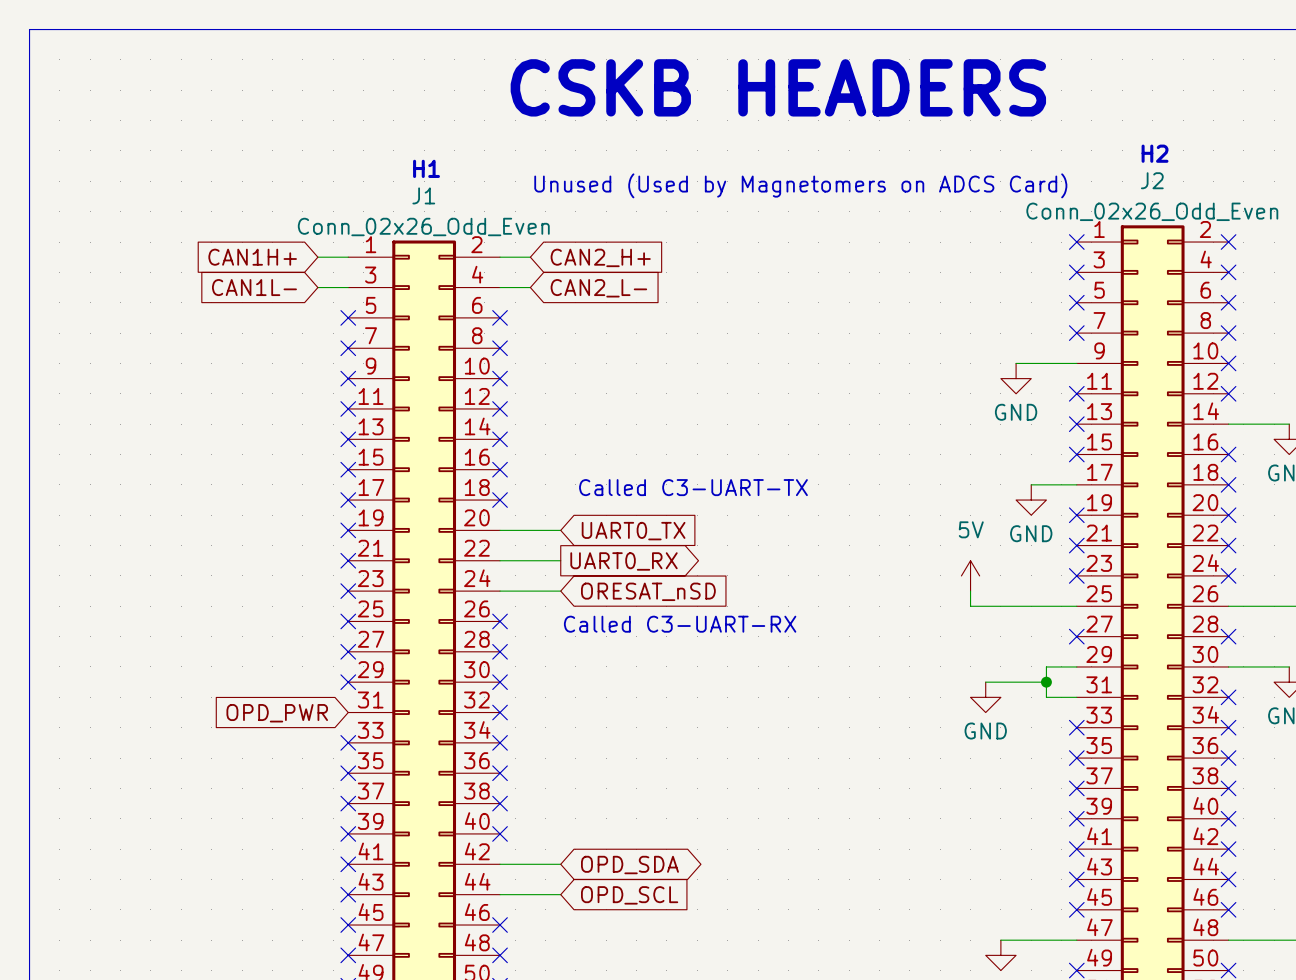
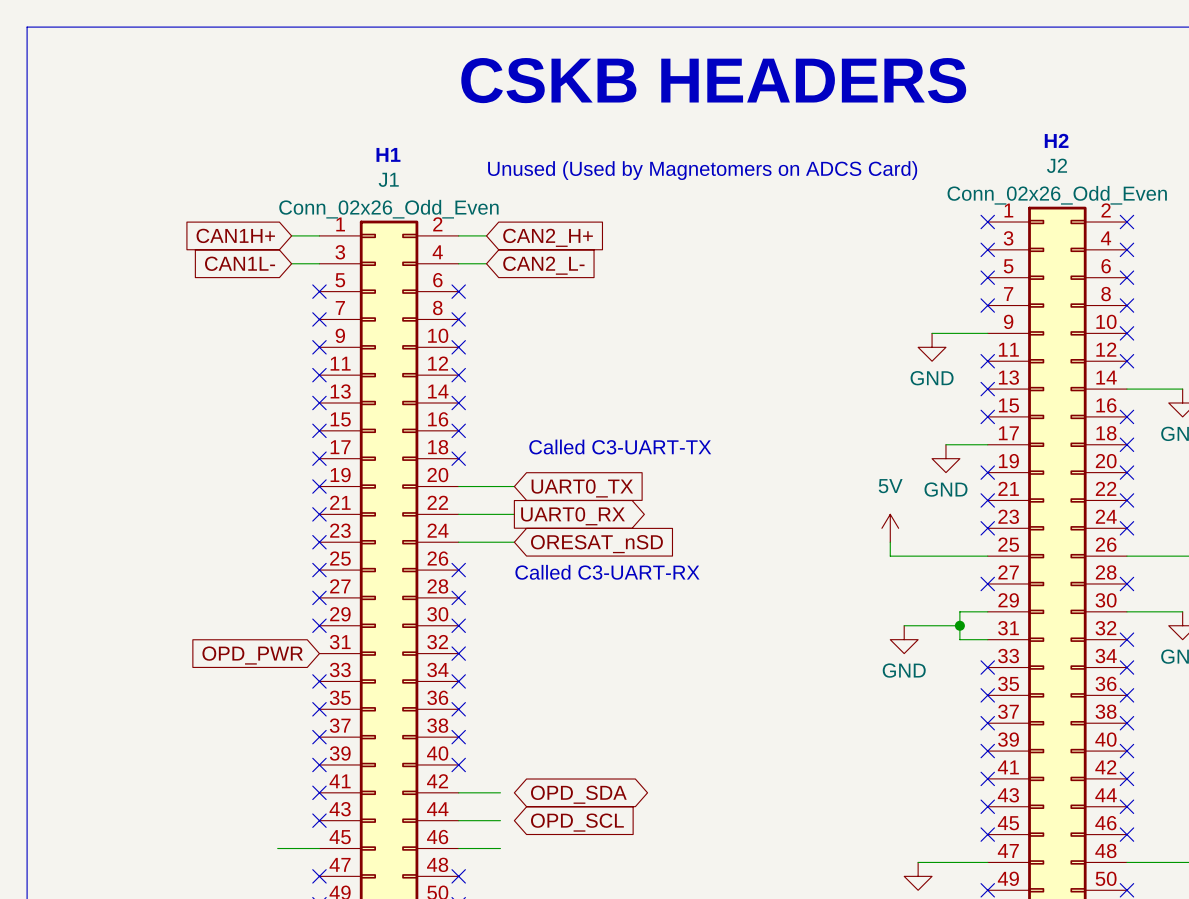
wire: (545, 864) (560, 864) -> none
wire: (545, 894) (560, 894) -> none
wire: none -> (277, 848) (319, 848)
no-connect mark: (348, 925) -> none
wire: none -> (458, 848) (500, 848)
no-connect mark: (500, 925) -> none

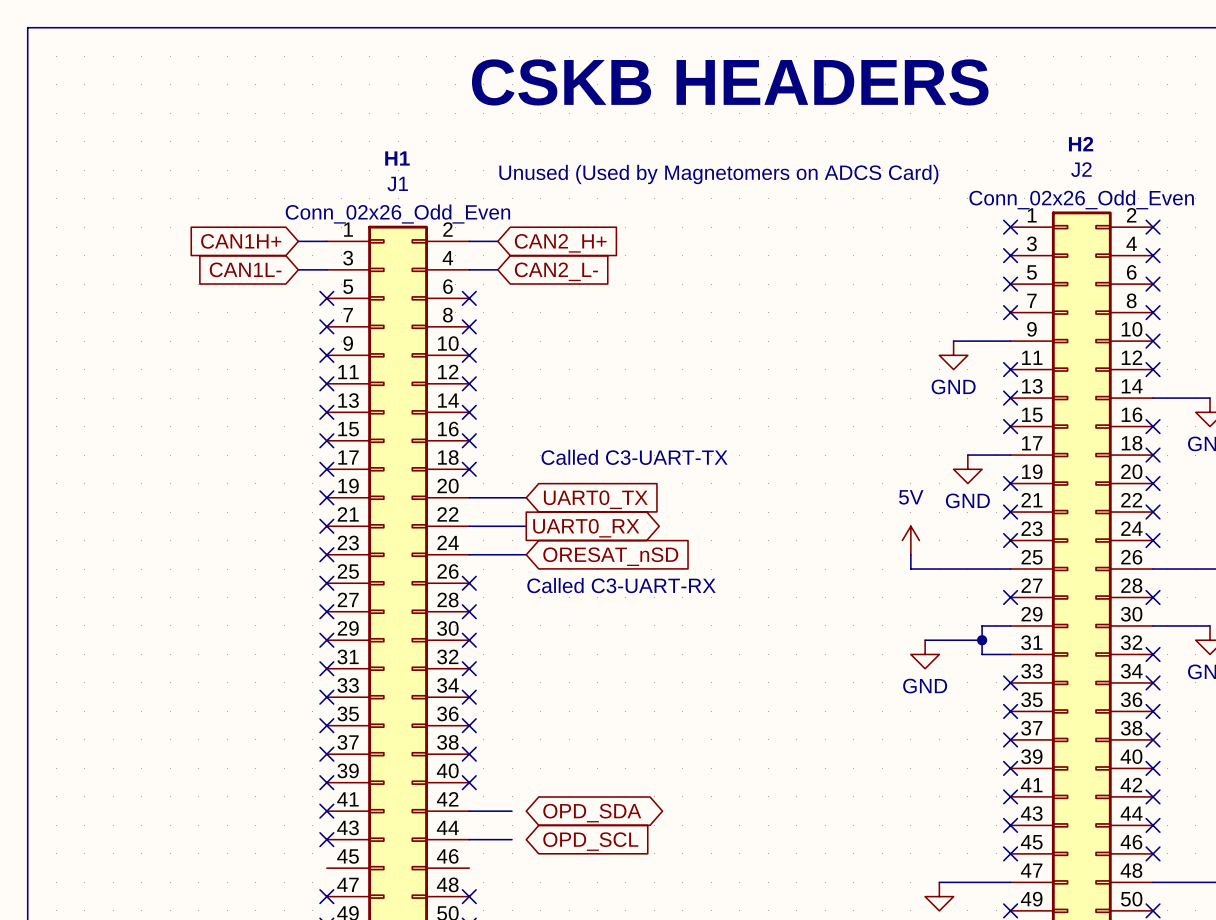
no-connect mark: none -> (326, 668)
global label: OPD_PWR (252, 655) -> none
wire: (277, 848) (319, 848) -> none
wire: (458, 848) (500, 848) -> none

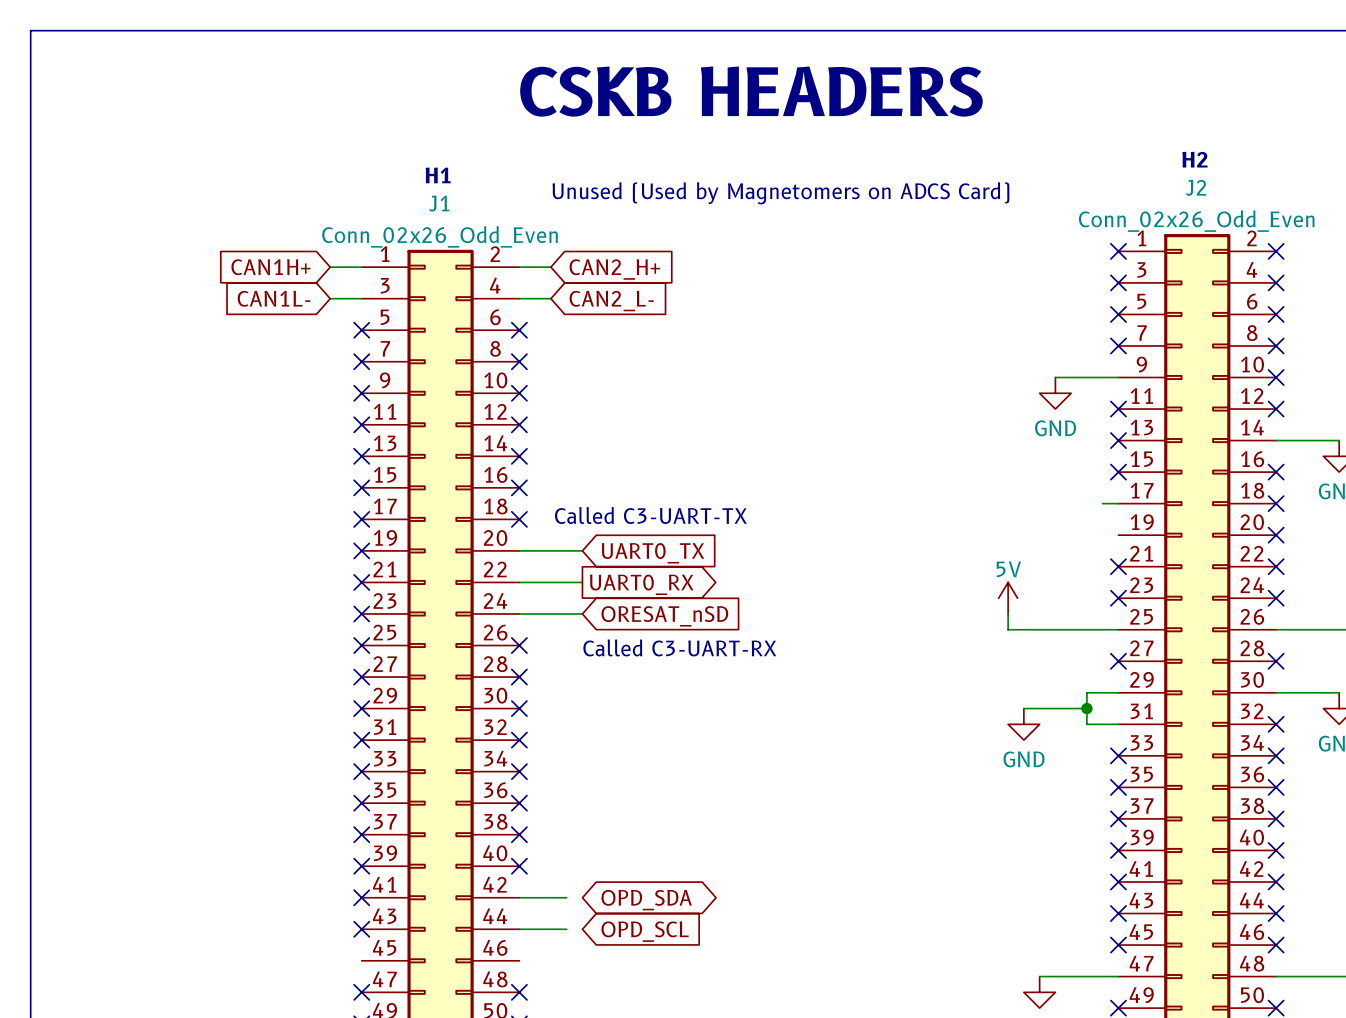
wire: (967, 455) (996, 455) -> none
text position: Called C3-UART-TX (634, 457) -> Called C3-UART-TX (650, 515)
power symbol: GND (967, 469) -> none
no-connect mark: (1010, 483) -> none
power symbol text position: 5V (911, 497) -> 5V (1008, 569)

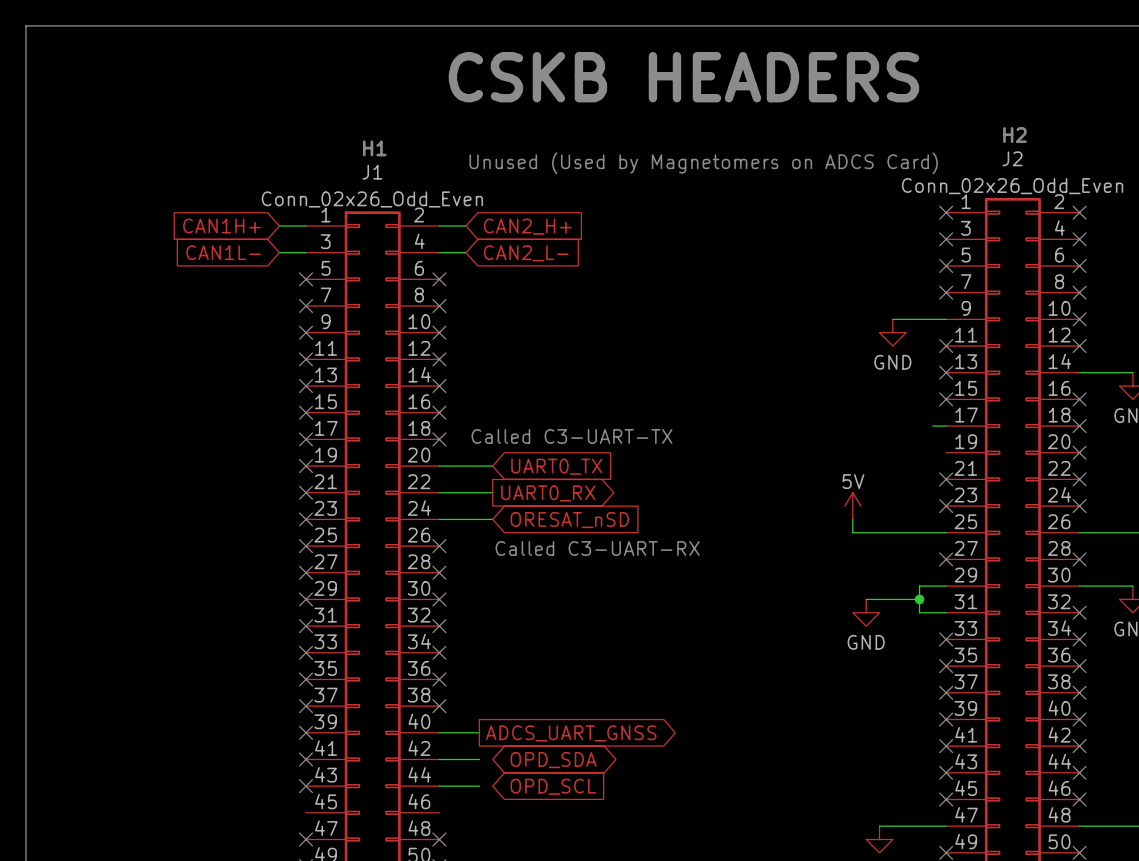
wire: none -> (439, 732) (479, 732)
no-connect mark: (519, 866) -> none
global label: none -> ADCS_UART_GNSS (571, 733)

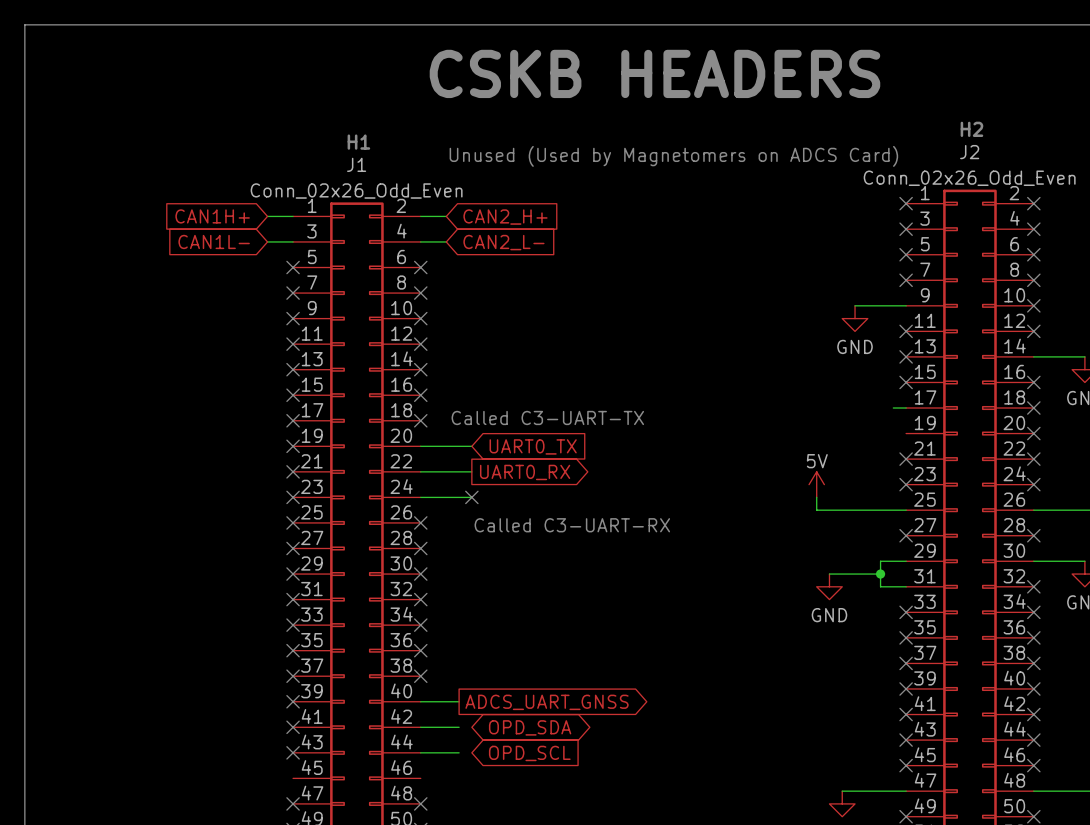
no-connect mark: none -> (471, 497)
global label: ORESAT_nSD (569, 520) -> none

